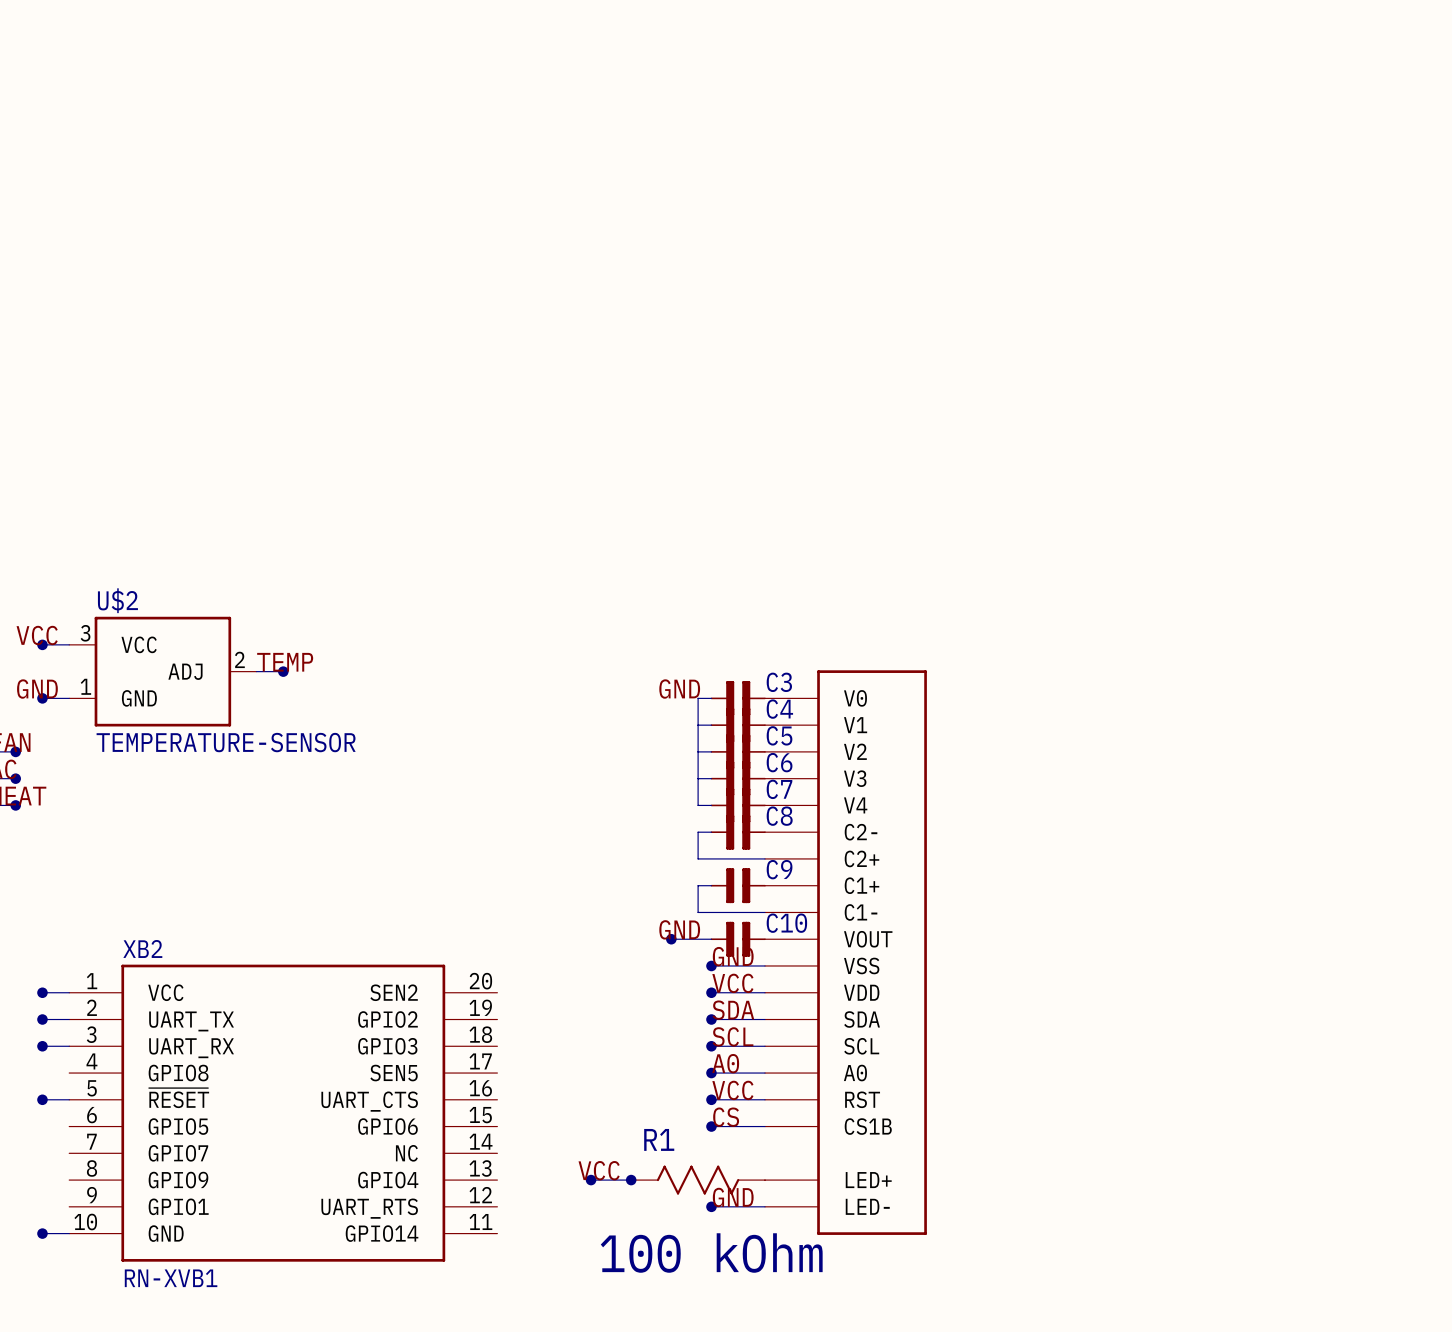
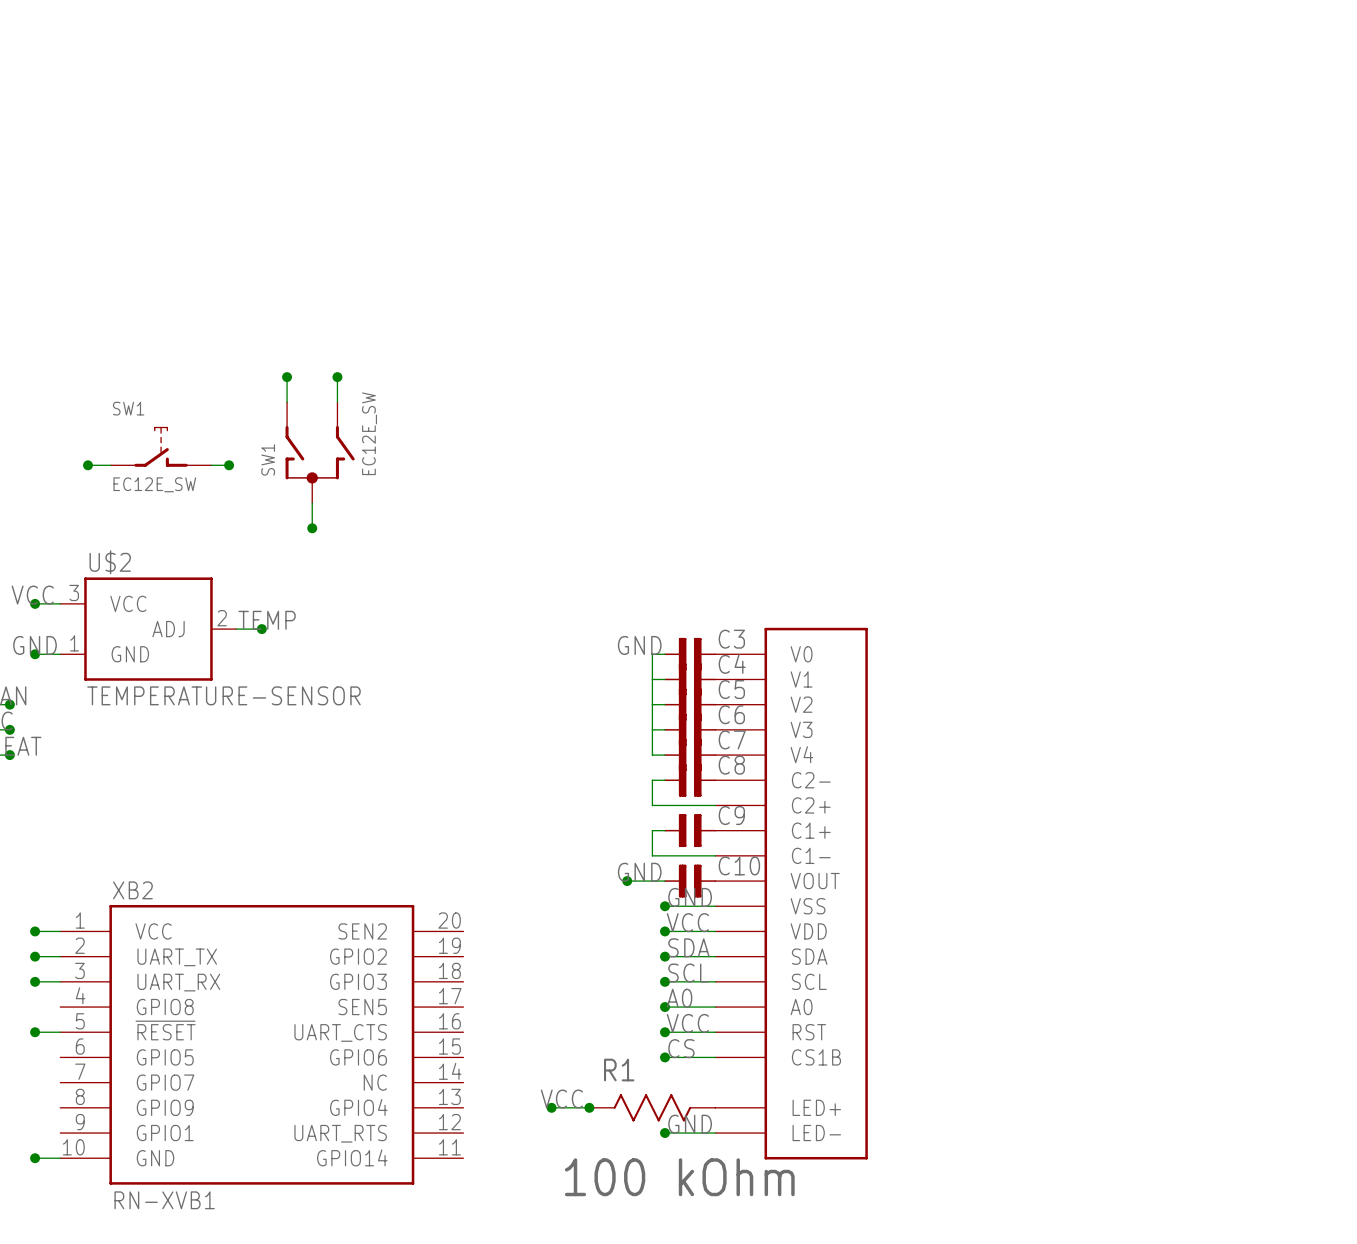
wire: none -> (287, 377) (287, 402)
junction: none -> (287, 377)
wire: none -> (337, 377) (337, 402)
junction: none -> (337, 377)
SW1: none -> EC12E_SW (161, 446)
SW1: none -> EC12E_SW (320, 452)
wire: none -> (87, 465) (110, 465)
junction: none -> (87, 465)
wire: none -> (211, 465) (229, 465)
junction: none -> (229, 465)
wire: none -> (312, 503) (312, 528)
junction: none -> (312, 528)

